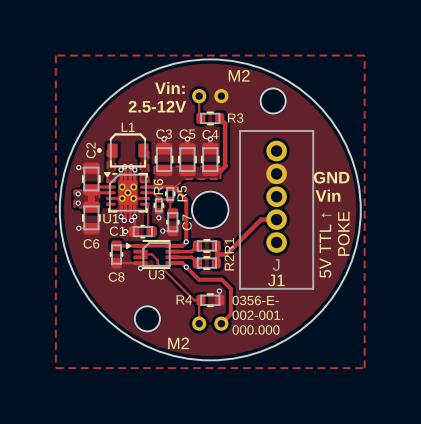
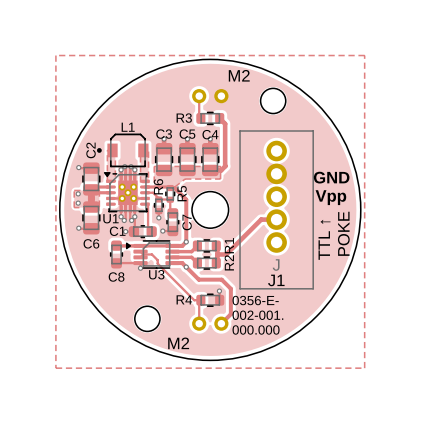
text: Vin: (169, 88) -> none
text: 2.5-12V (157, 106) -> none
R3 name position: R3 (235, 118) -> R3 (184, 118)
text: Vin (327, 195) -> Vpp (330, 197)
text: 5V TTL ↑ (325, 245) -> TTL ↑ (324, 239)

